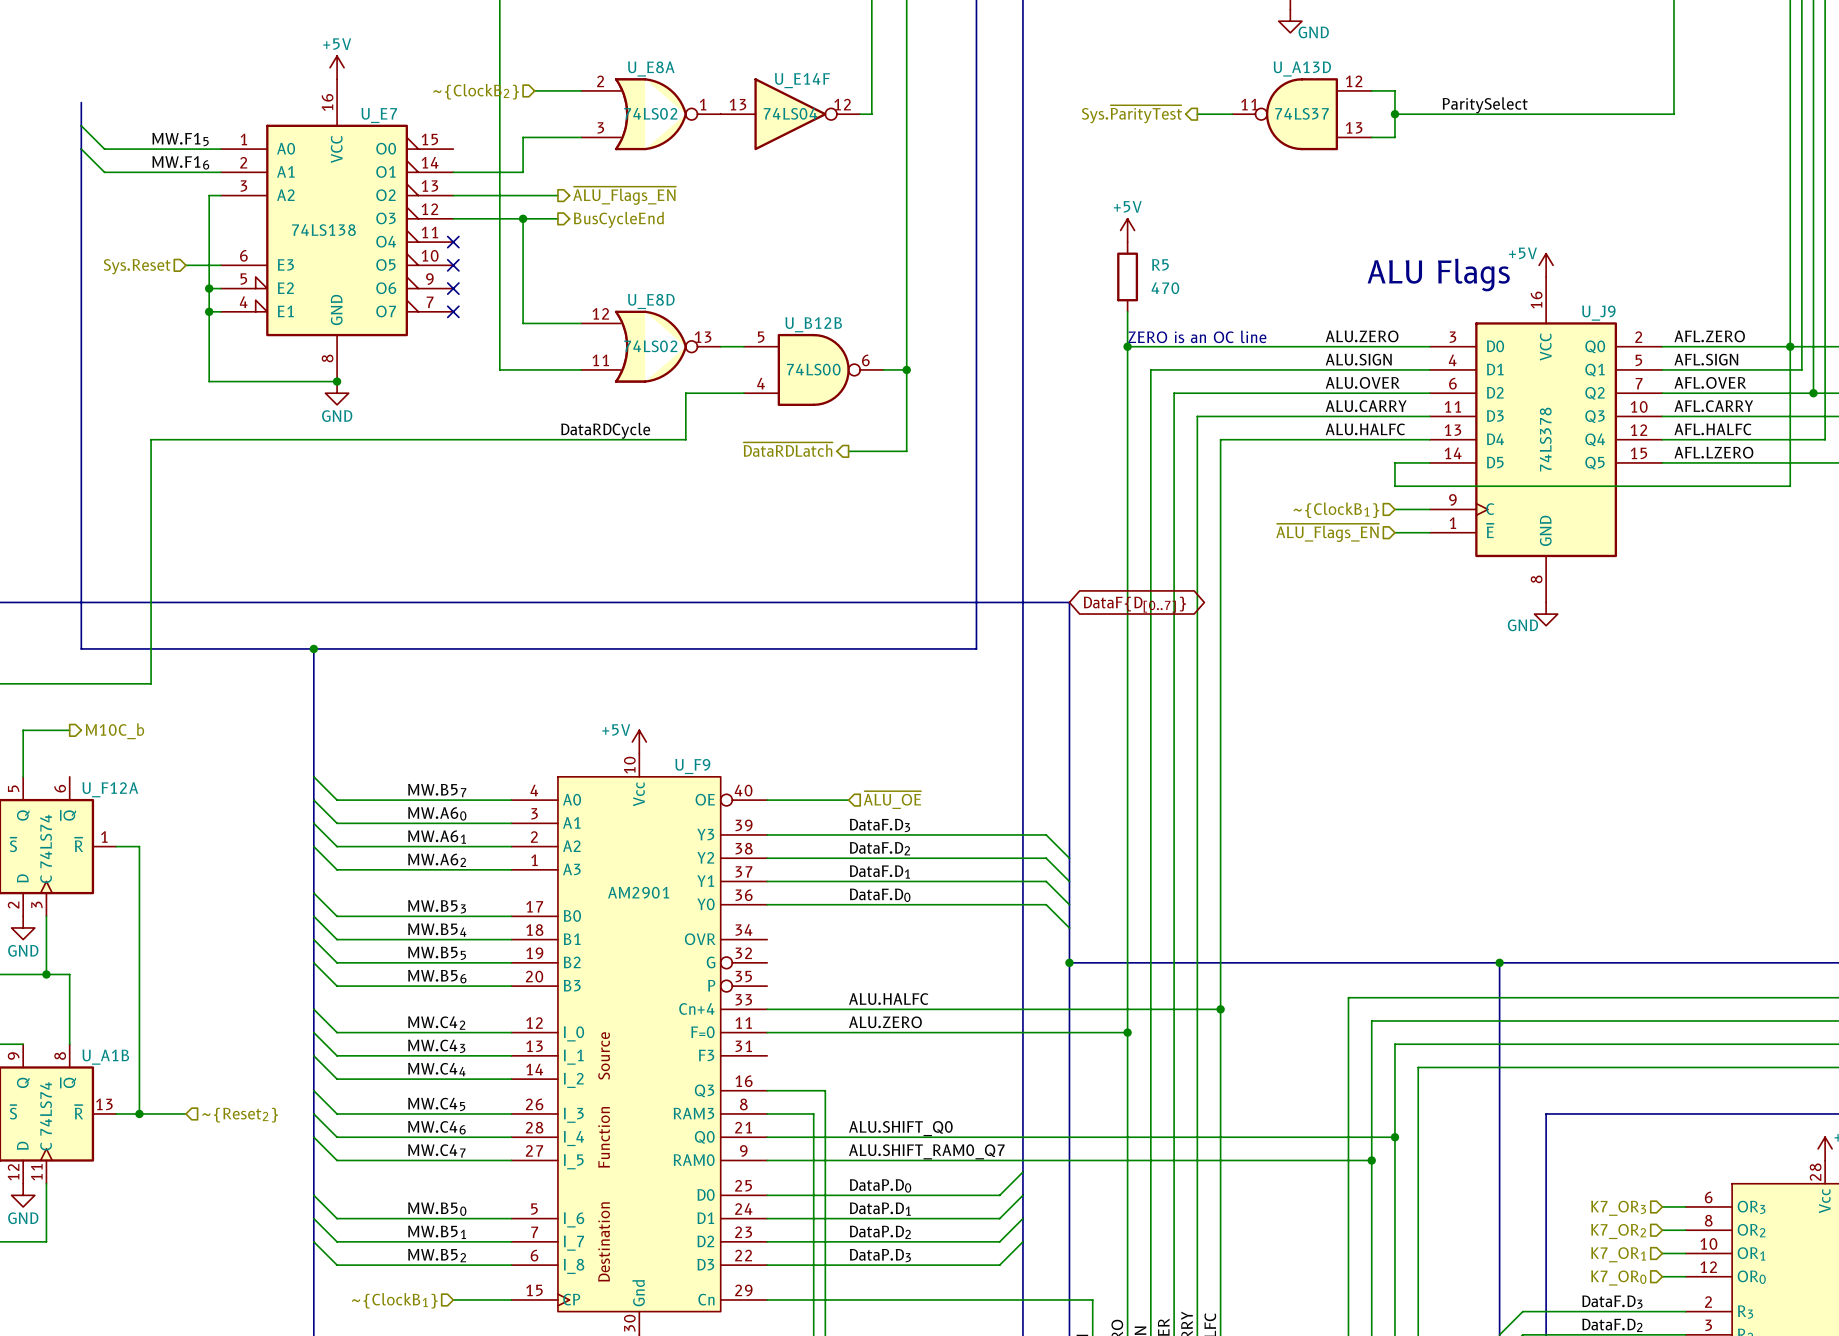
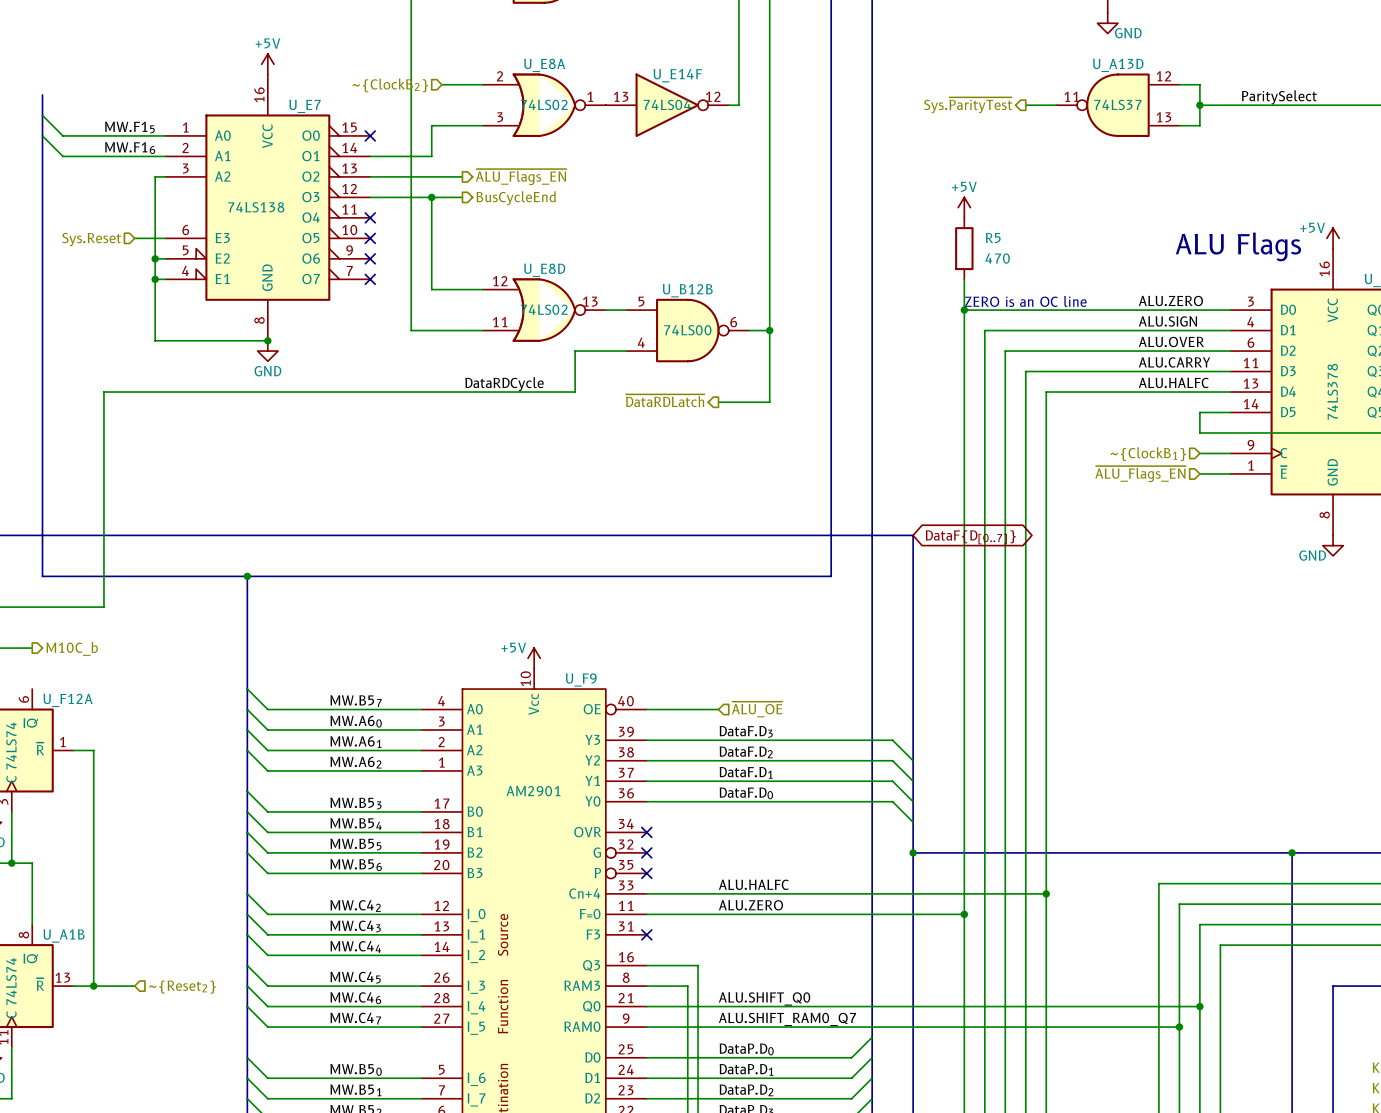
no-connect mark: none -> (370, 135)
no-connect mark: none -> (646, 832)
no-connect mark: none -> (646, 852)
no-connect mark: none -> (646, 873)
no-connect mark: none -> (646, 934)

